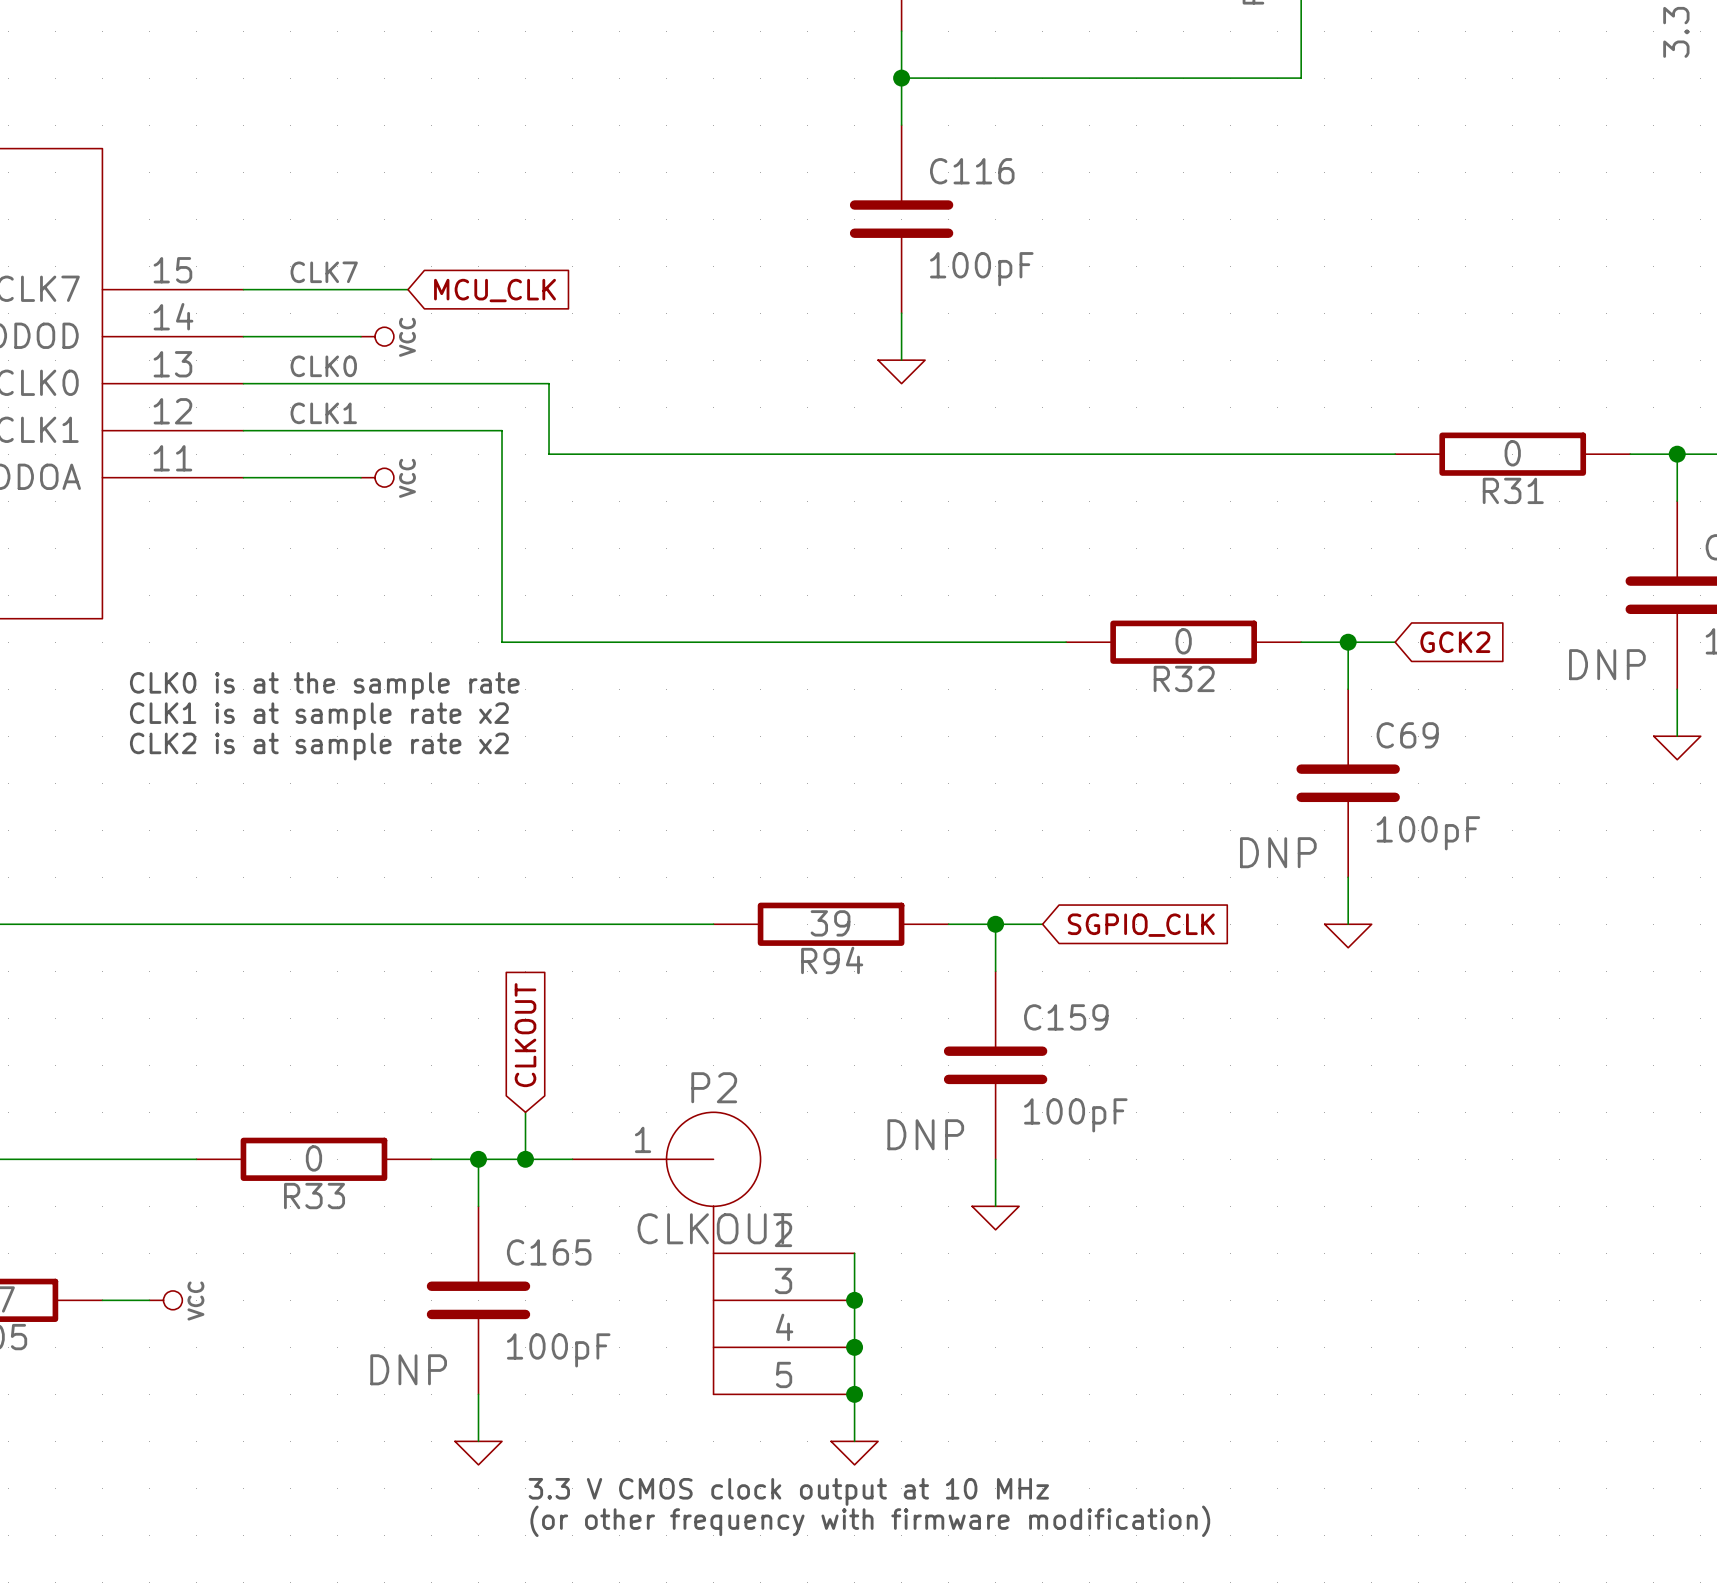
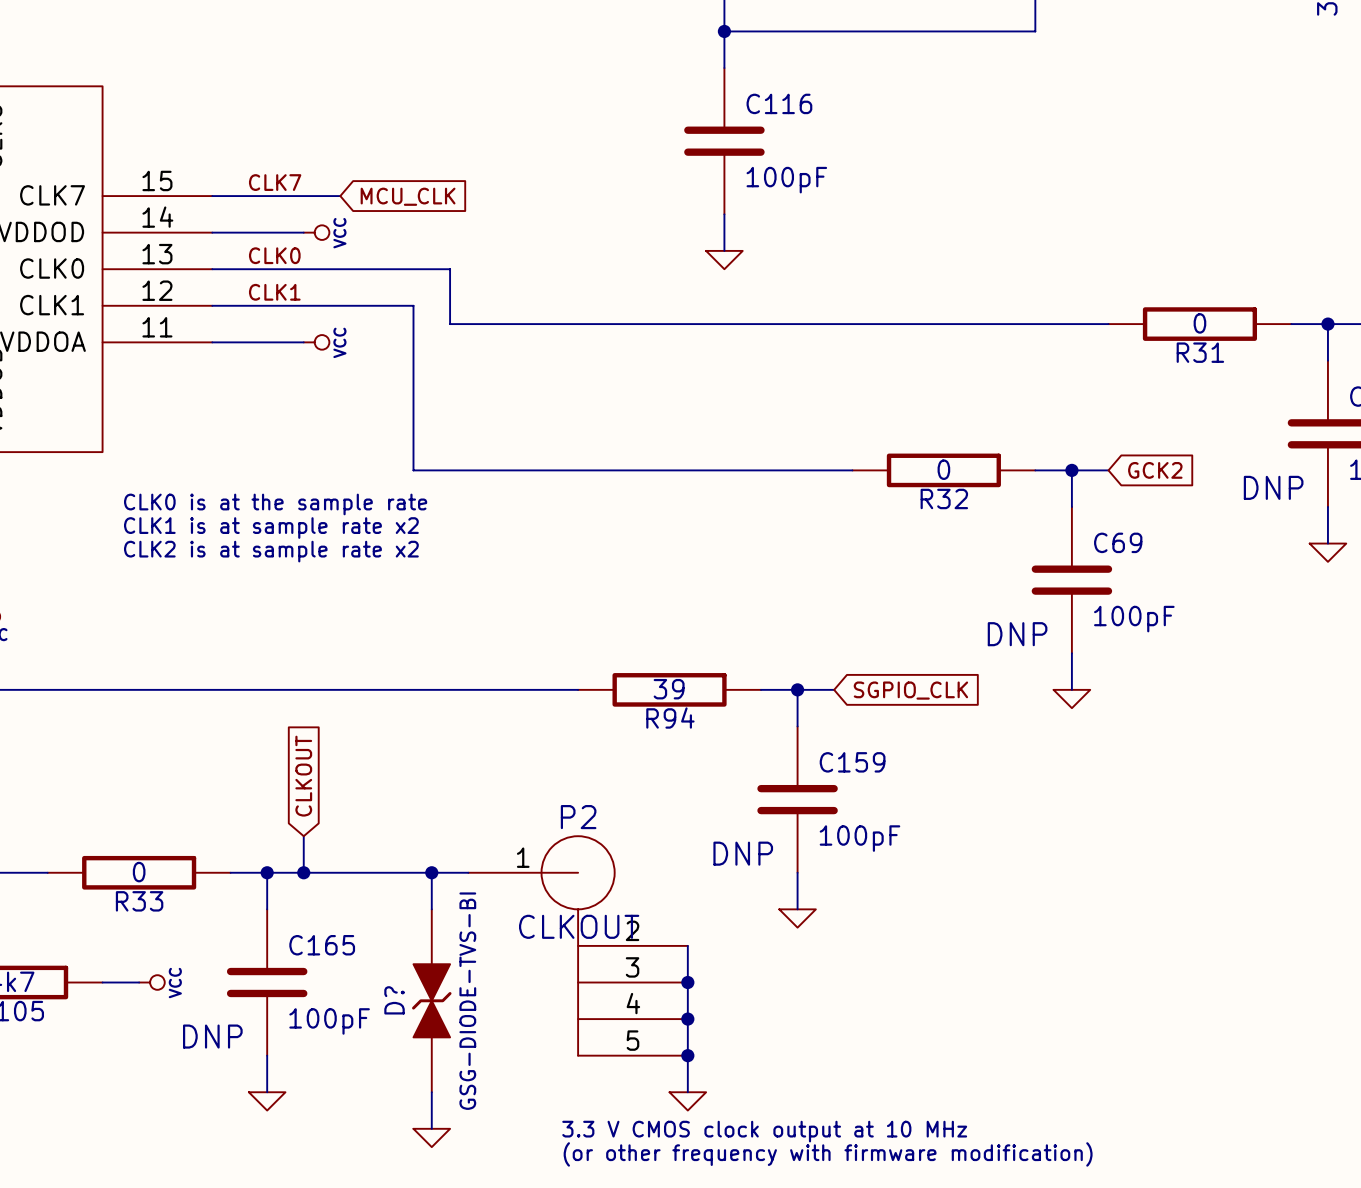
global label position: CLKOUT (525, 1035) -> CLKOUT (303, 776)
wire: none -> (303, 836) (303, 872)
wire: (525, 1112) (525, 1159) -> (431, 909) (431, 872)
wire: (31, 1159) (196, 1159) -> (230, 872) (358, 872)
R33 position: (313, 1159) -> (139, 872)
junction: none -> (267, 872)
junction: none -> (303, 872)
wire: (478, 1159) (478, 1206) -> (267, 872) (267, 909)
junction: (478, 1159) -> none
C165 position: (478, 1300) -> (267, 982)
D?: none -> GSG-DIODE-TVS-BI (431, 1000)
wire: (478, 1394) (478, 1441) -> (267, 1055) (267, 1092)
wire: none -> (431, 1092) (431, 1128)
power symbol: none -> (267, 1101)
power symbol position: (478, 1453) -> (431, 1137)
text position: 3.3 V CMOS clock output at 10 MHz (788, 1491) -> 3.3 V CMOS clock output at 10 MHz (764, 1131)
text position: (or other frequency with firmware modification) (870, 1521) -> (or other frequency with firmware modification) (828, 1154)

